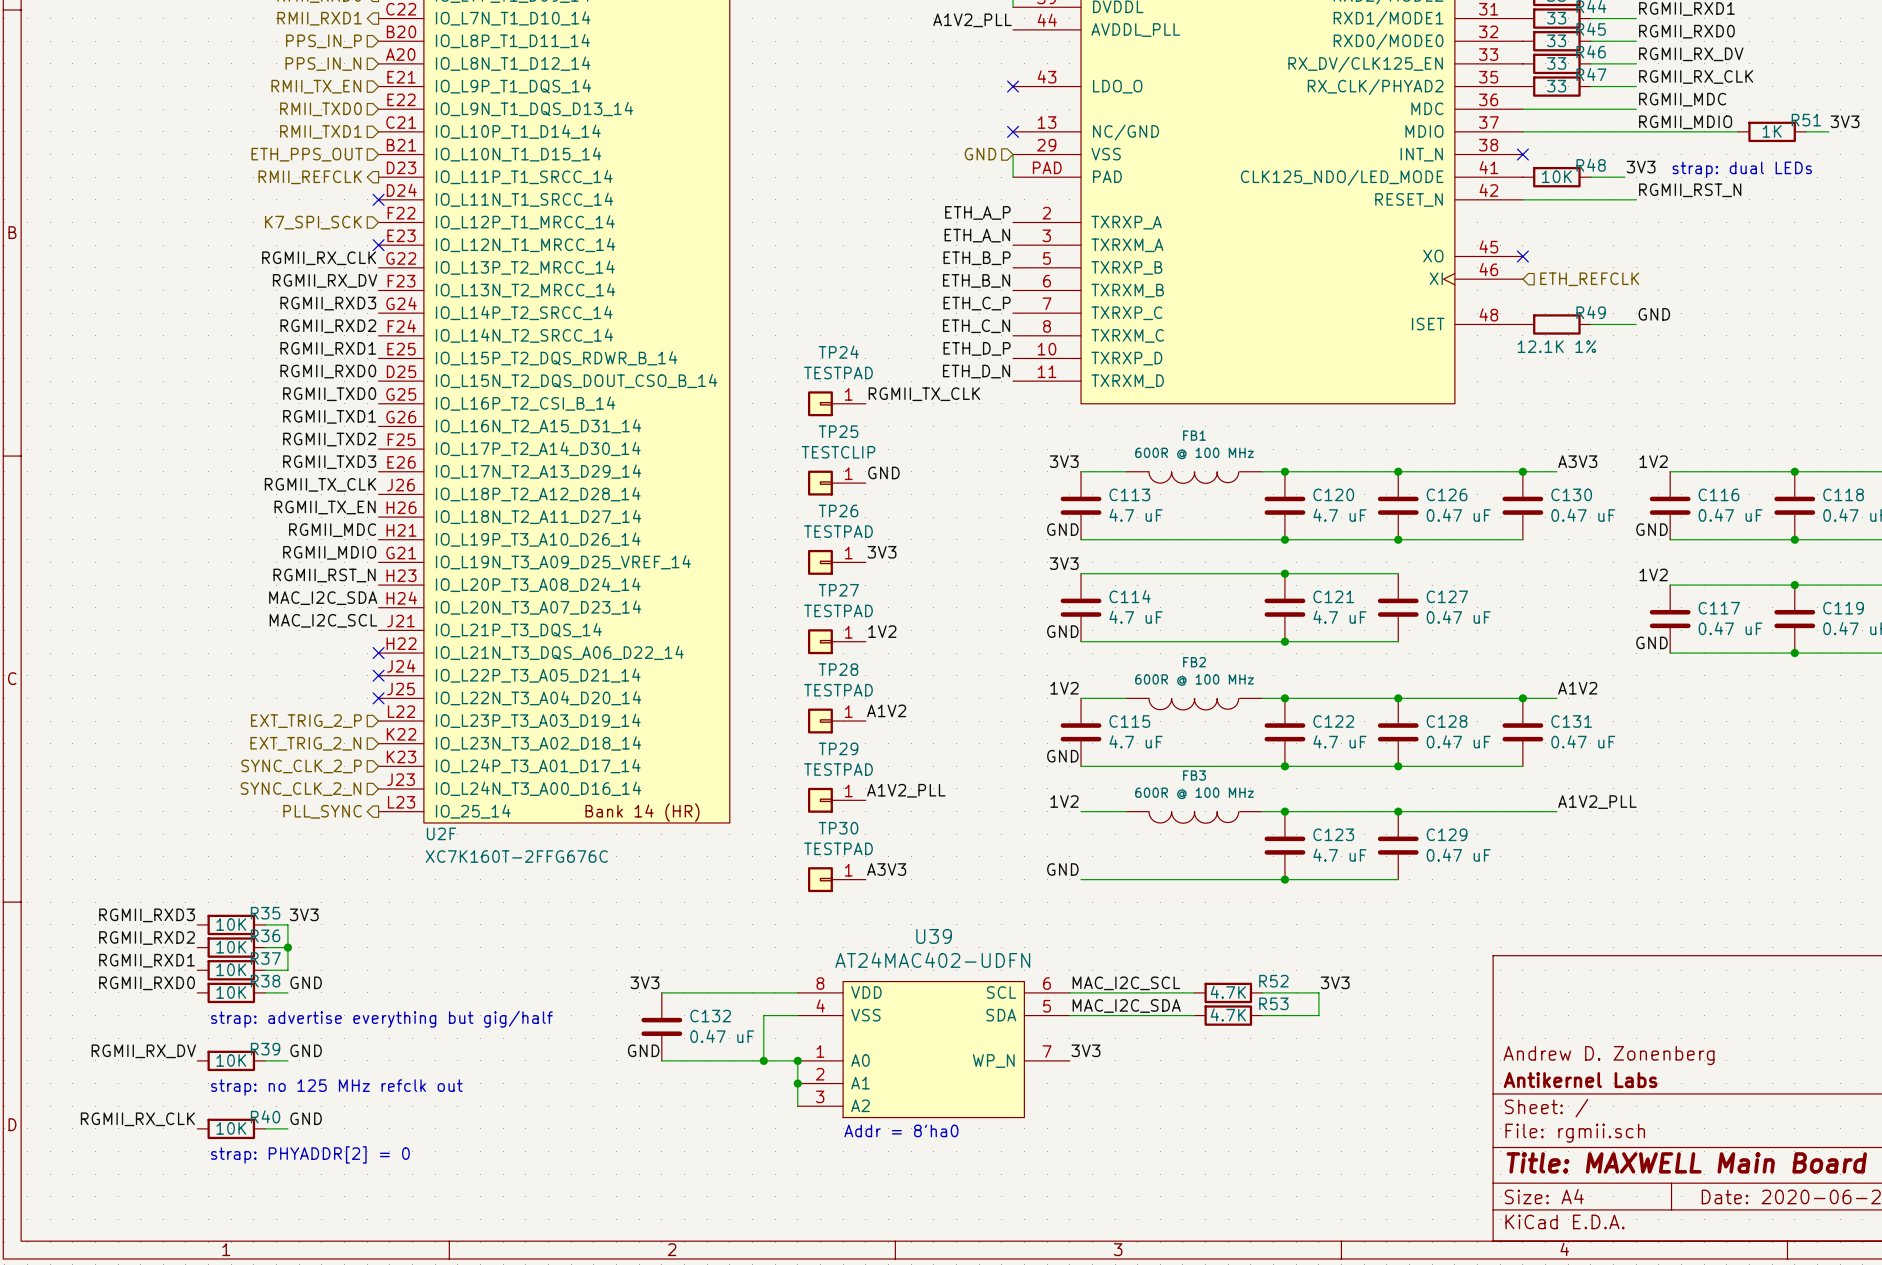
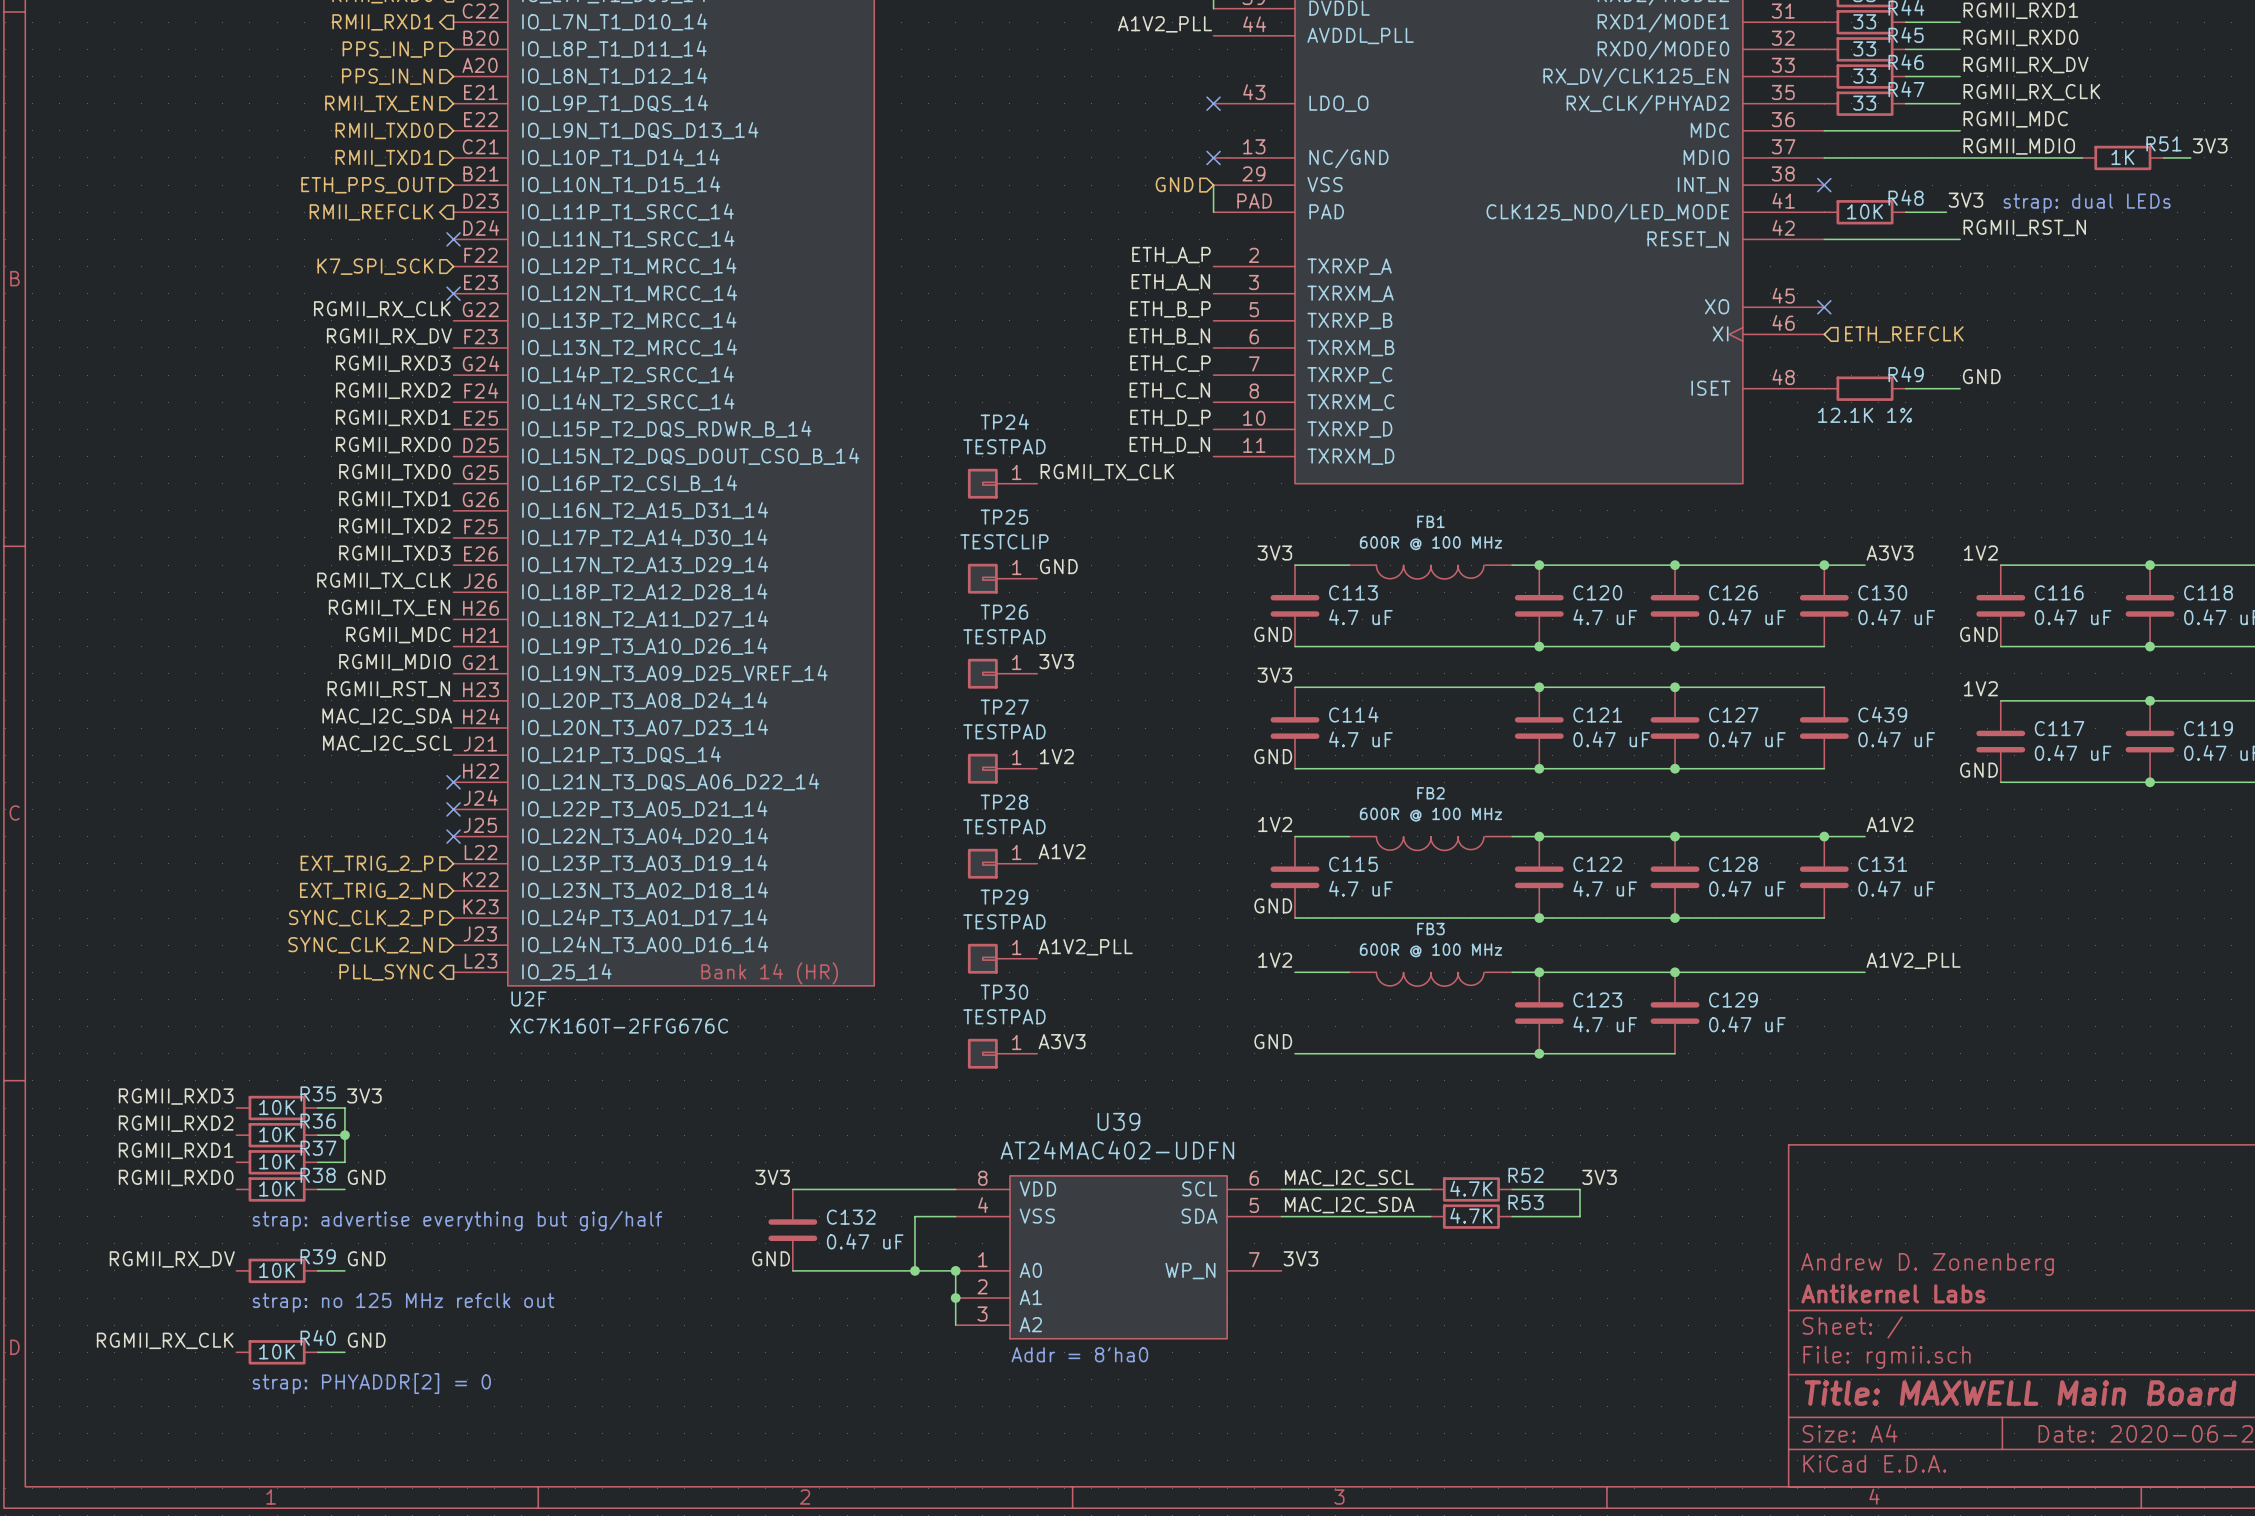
wire: none -> (1675, 687) (1824, 687)
junction: none -> (1675, 687)
C439: none -> 0.47 uF (1824, 728)
C121 value: 4.7 uF (1339, 617) -> 0.47 uF (1611, 739)
wire: none -> (1675, 768) (1824, 768)
junction: none -> (1675, 768)

